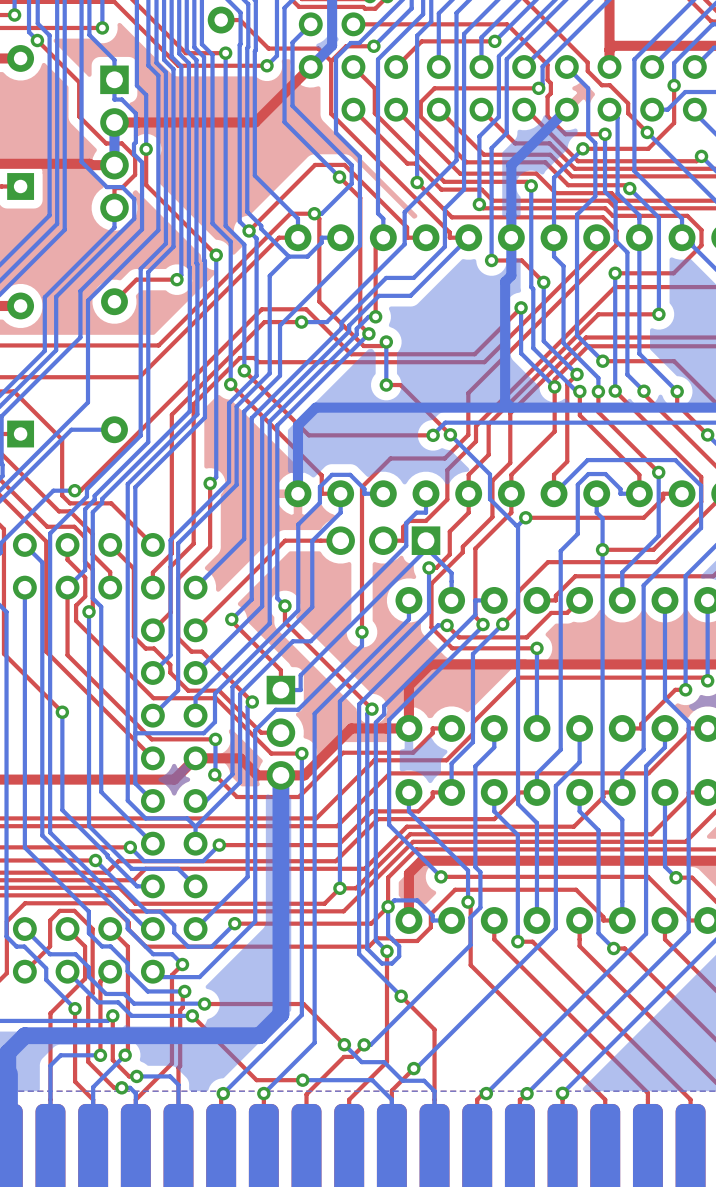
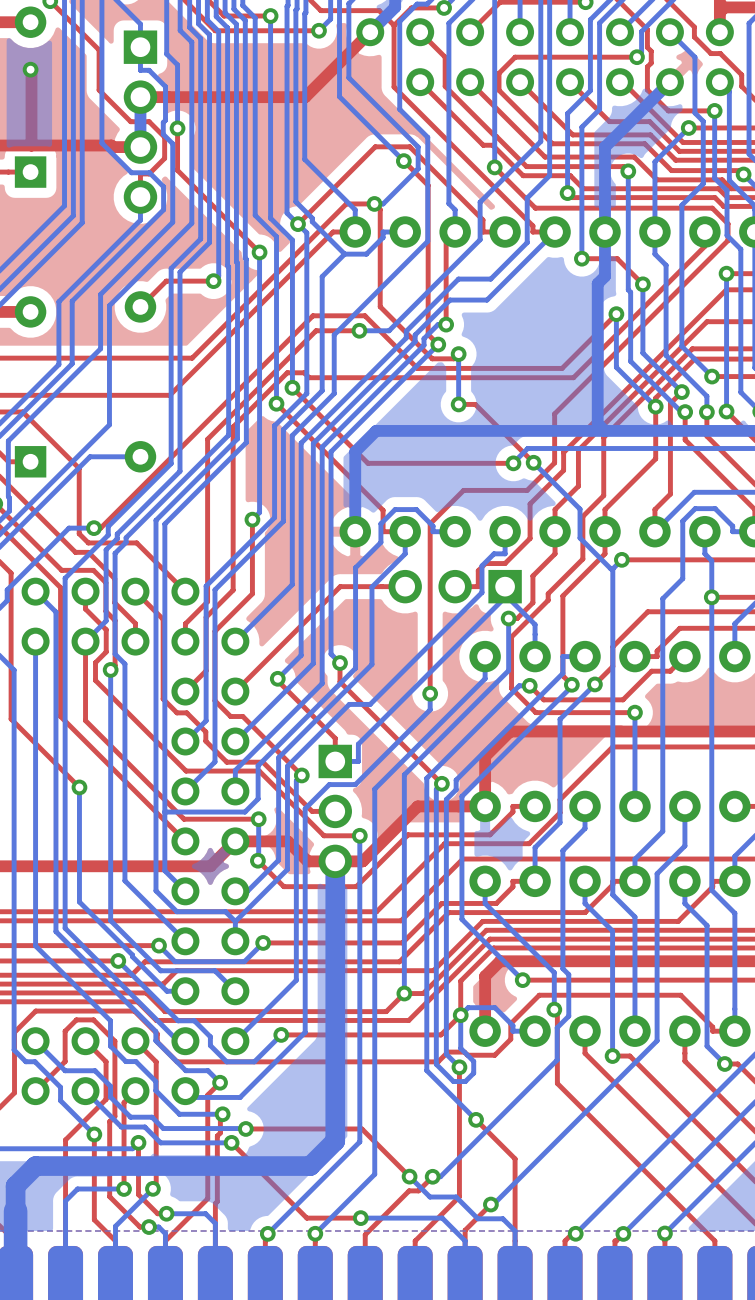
top track: none -> (30, 69) (31, 145)
via: none -> (30, 69)

